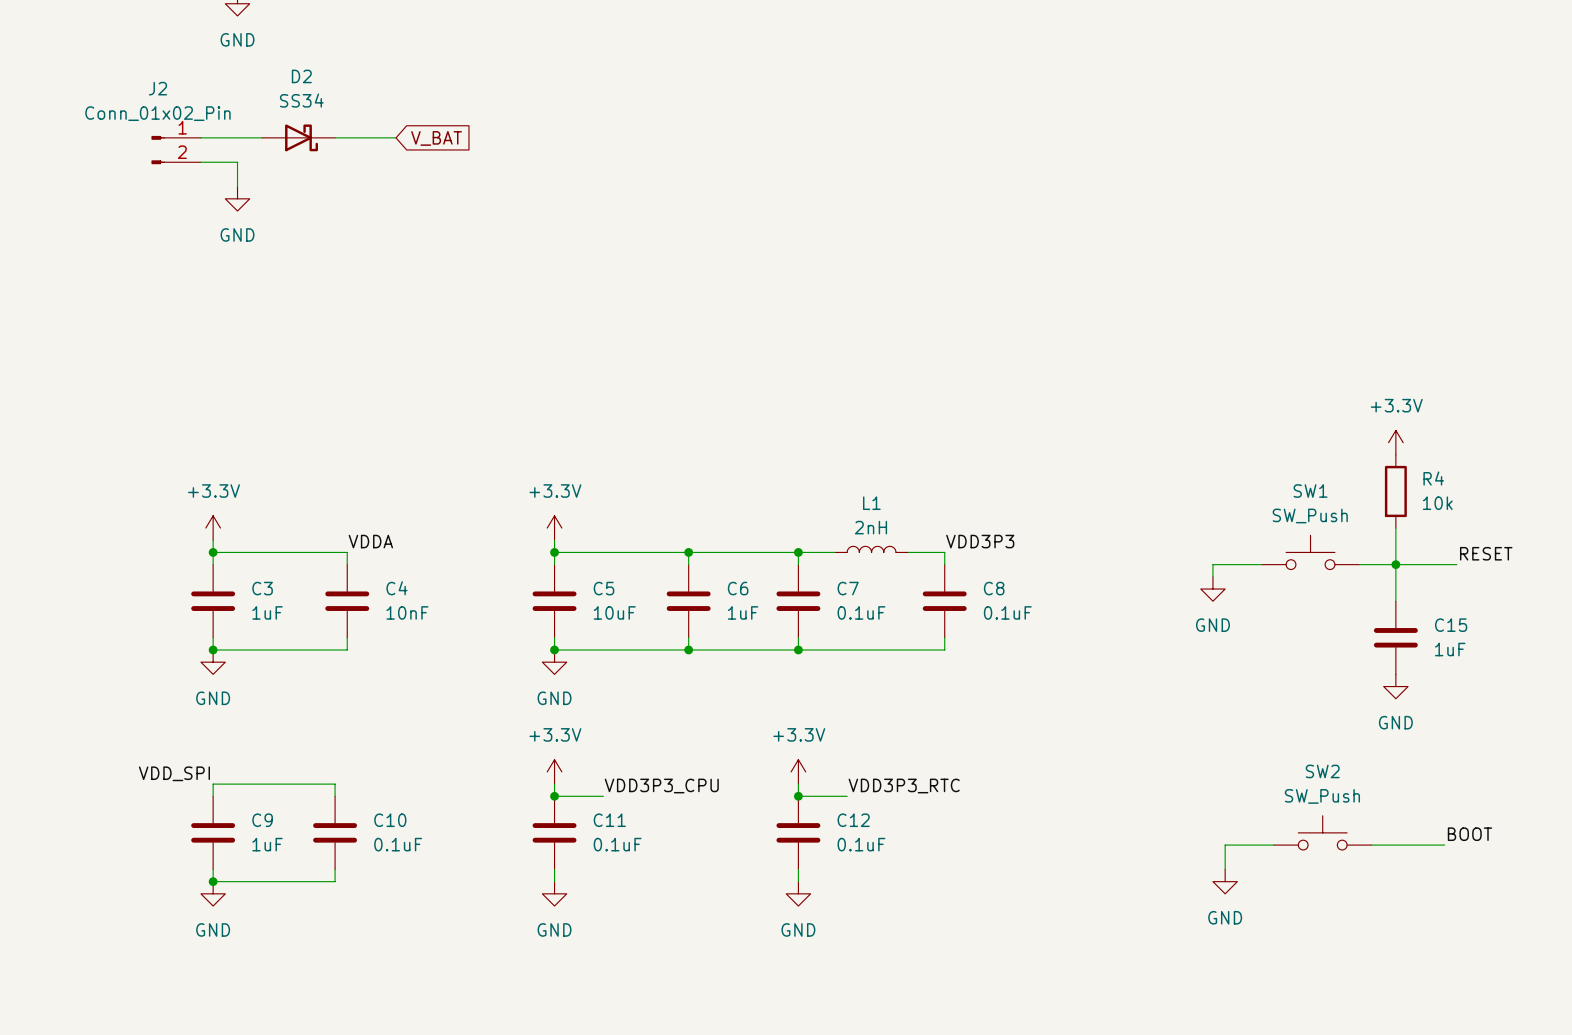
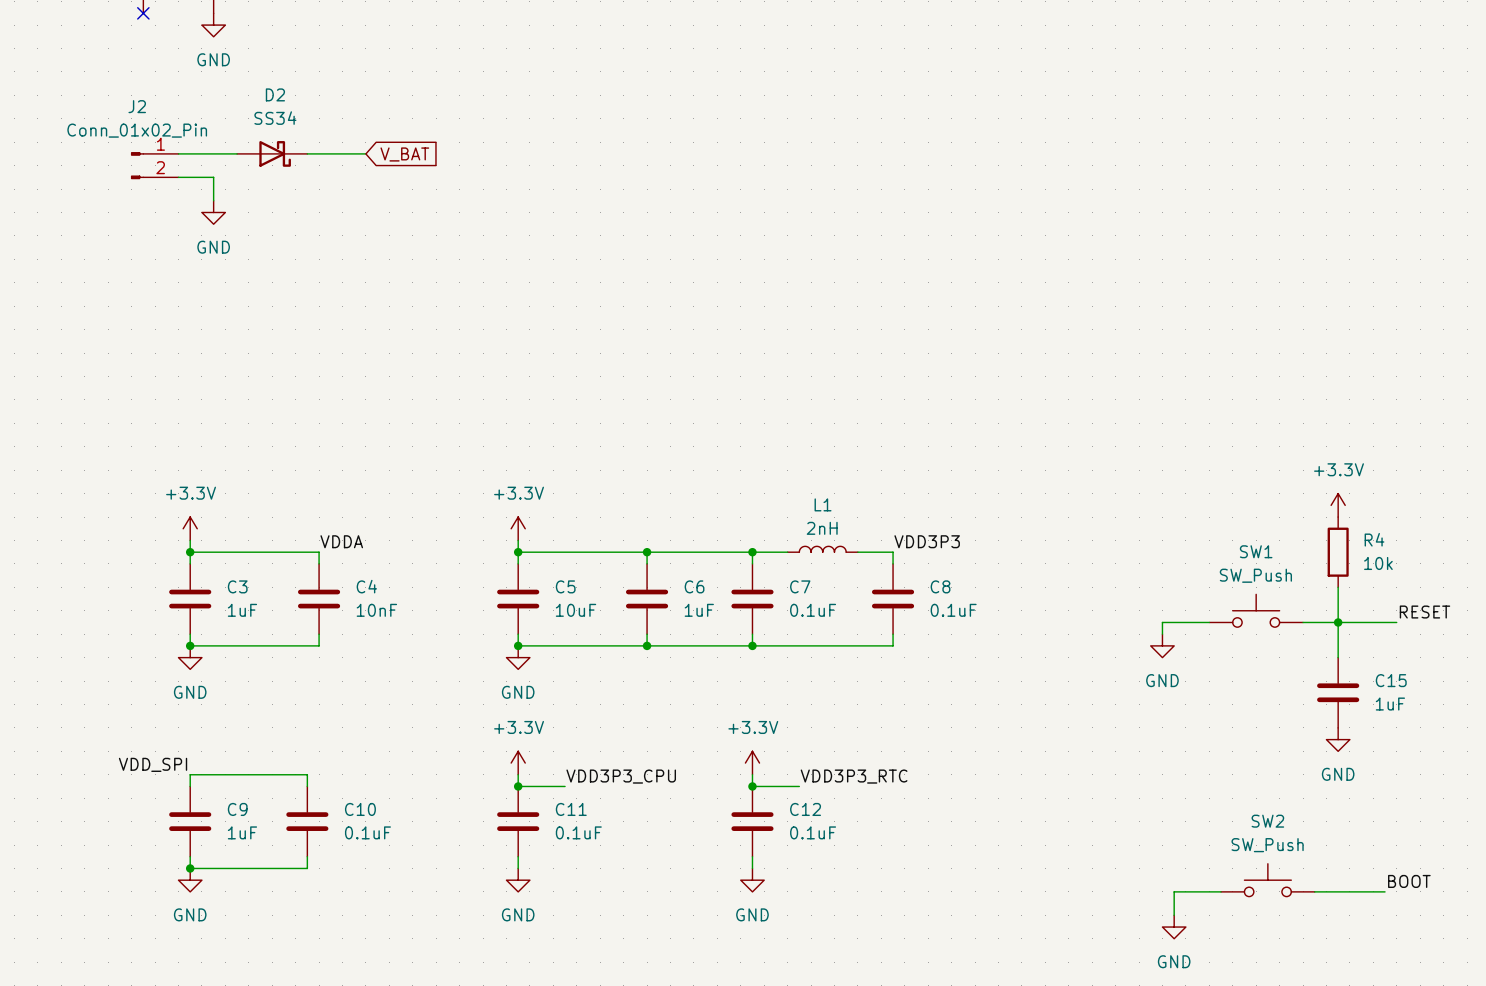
power symbol position: +3.3V (1395, 442) -> +3.3V (1338, 505)
R4 position: (1395, 491) -> (1338, 552)
wire: (1395, 528) (1395, 601) -> (1338, 587) (1338, 657)
SW1 position: (1310, 552) -> (1256, 610)
label position: RESET (1486, 553) -> RESET (1424, 612)
wire: (1261, 564) (1212, 564) (1212, 576) -> (1209, 622) (1162, 622) (1162, 634)
wire: (1359, 564) (1456, 564) -> (1303, 622) (1396, 622)
junction: (1395, 564) -> none
power symbol position: GND (1212, 589) -> GND (1162, 645)
junction: none -> (1338, 622)
C15 position: (1395, 637) -> (1338, 692)
power symbol position: GND (1395, 686) -> GND (1338, 739)
SW2 position: (1322, 832) -> (1267, 880)
label position: BOOT (1469, 834) -> BOOT (1409, 881)
wire: (1273, 845) (1225, 845) (1225, 869) -> (1221, 891) (1174, 891) (1174, 915)
wire: (1371, 845) (1444, 845) -> (1314, 891) (1385, 891)
power symbol position: GND (1225, 881) -> GND (1174, 927)

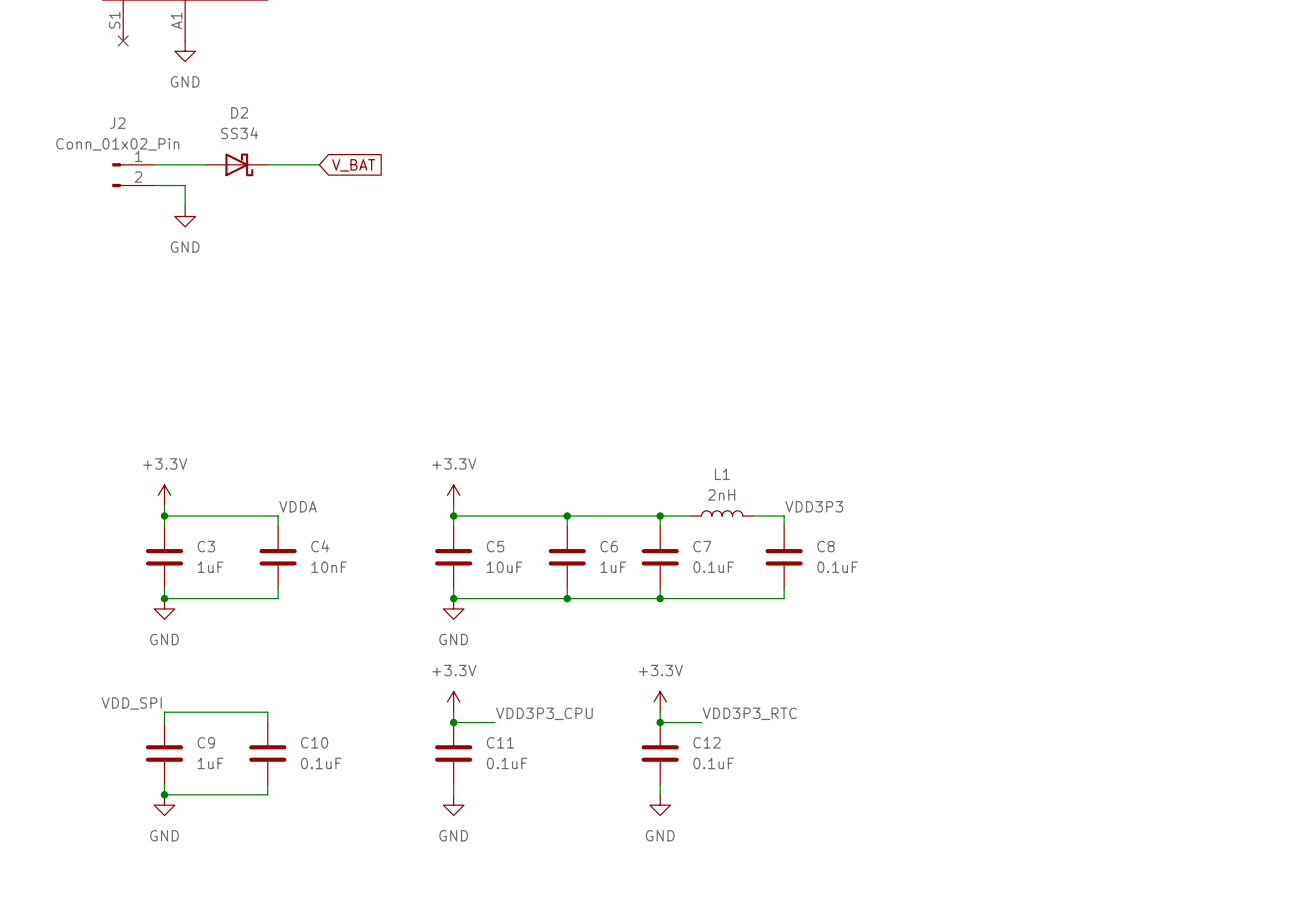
power symbol: +3.3V (1338, 505) -> none
R4: 10k (1338, 552) -> none
wire: (1338, 587) (1338, 657) -> none
SW1: SW_Push (1256, 610) -> none
label: RESET (1424, 612) -> none
wire: (1209, 622) (1162, 622) (1162, 634) -> none
wire: (1303, 622) (1396, 622) -> none
junction: (1338, 622) -> none
power symbol: GND (1162, 645) -> none
C15: 1uF (1338, 692) -> none
power symbol: GND (1338, 739) -> none
SW2: SW_Push (1267, 880) -> none
label: BOOT (1409, 881) -> none
wire: (1221, 891) (1174, 891) (1174, 915) -> none
wire: (1314, 891) (1385, 891) -> none
power symbol: GND (1174, 927) -> none

